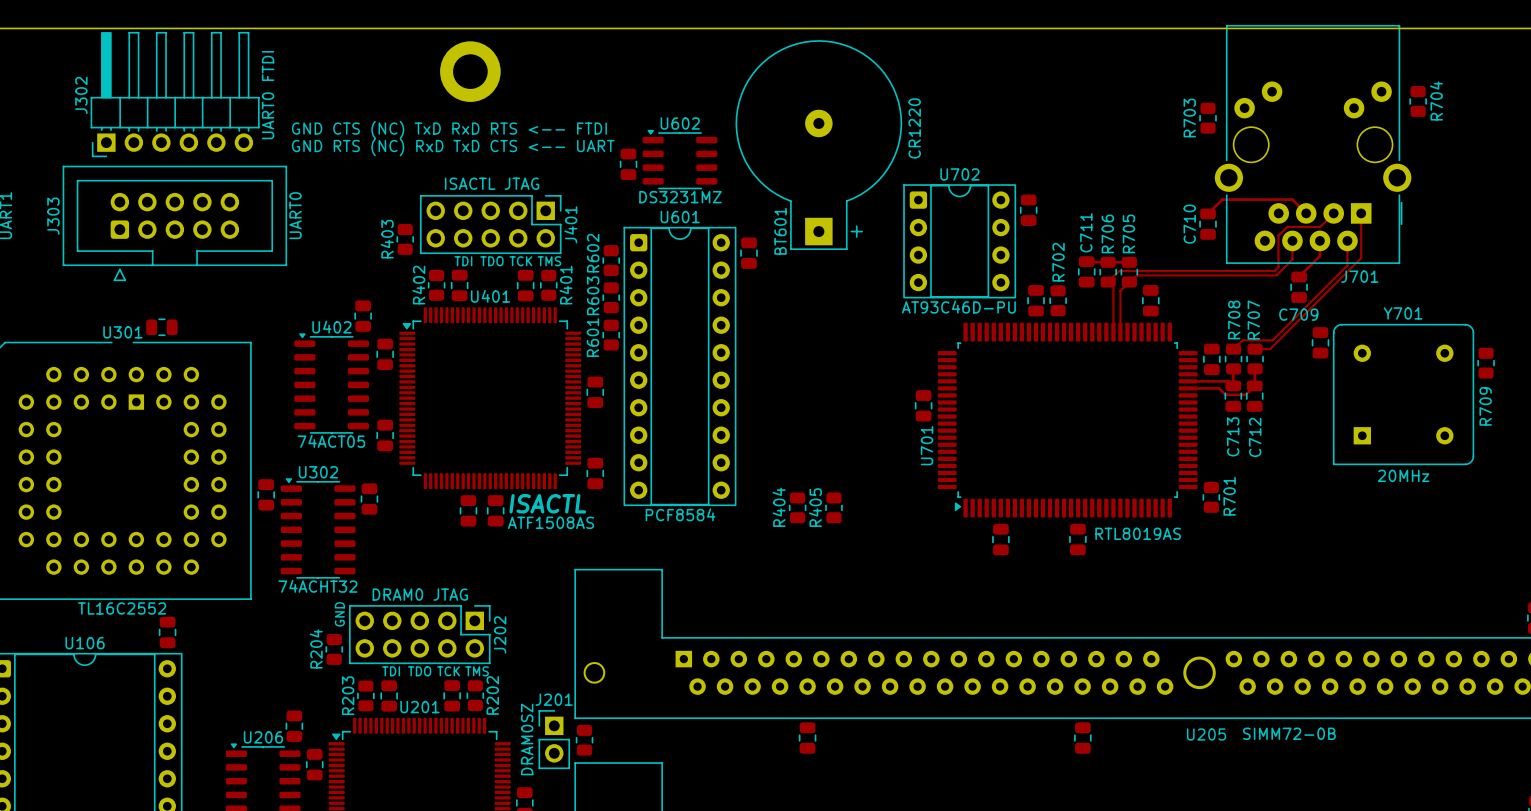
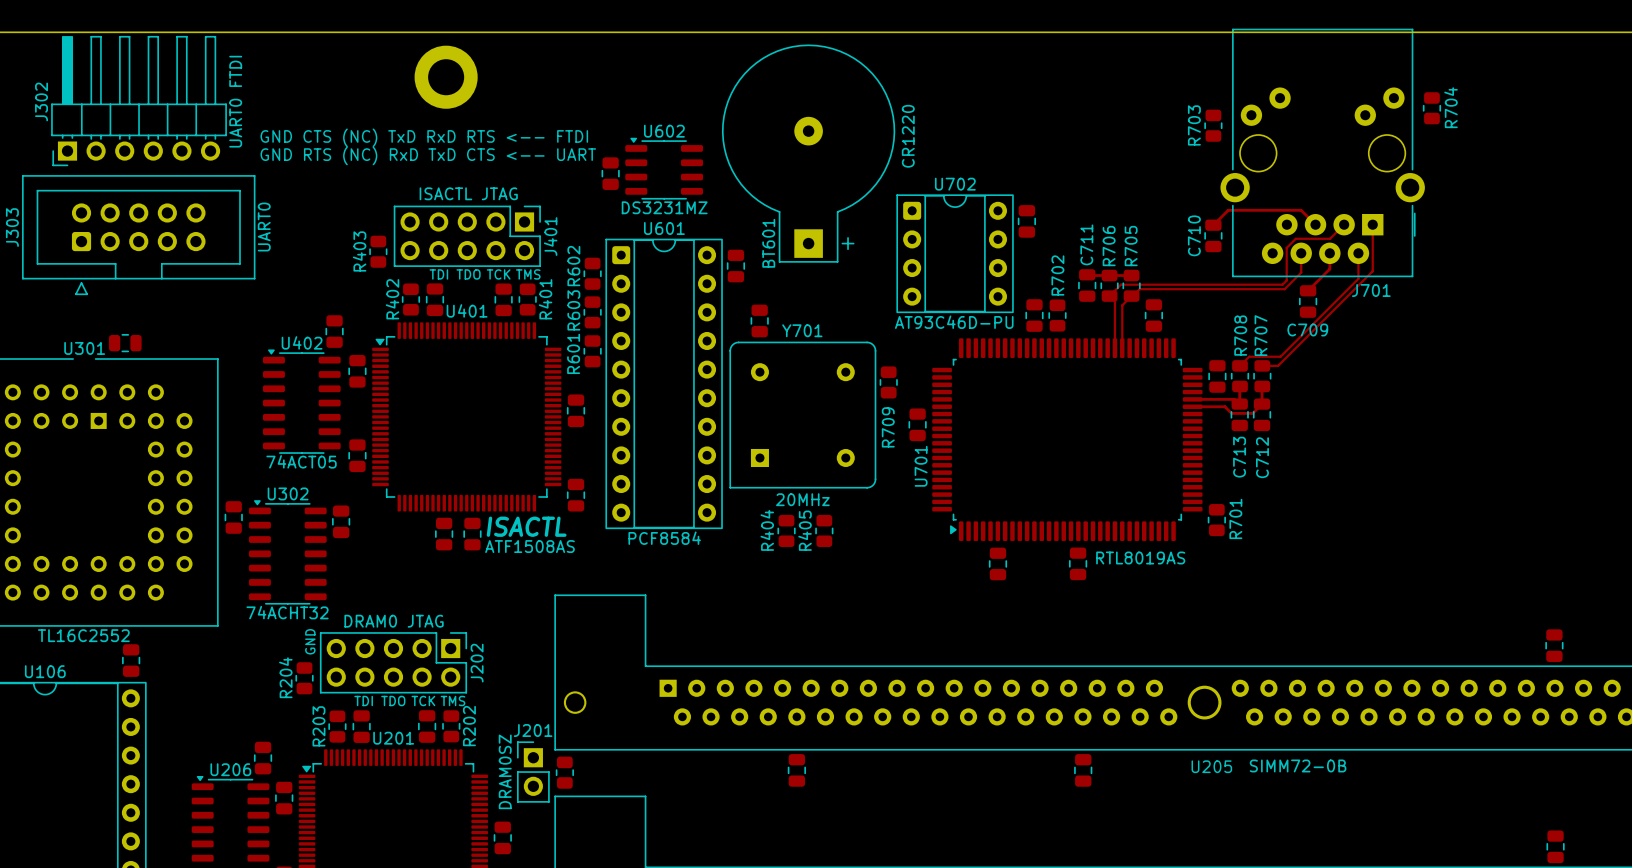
part: none -> (759, 320)
part: (1320, 342) -> none
R709 position: (1486, 363) -> (888, 382)
Y701 position: (1403, 394) -> (802, 415)

